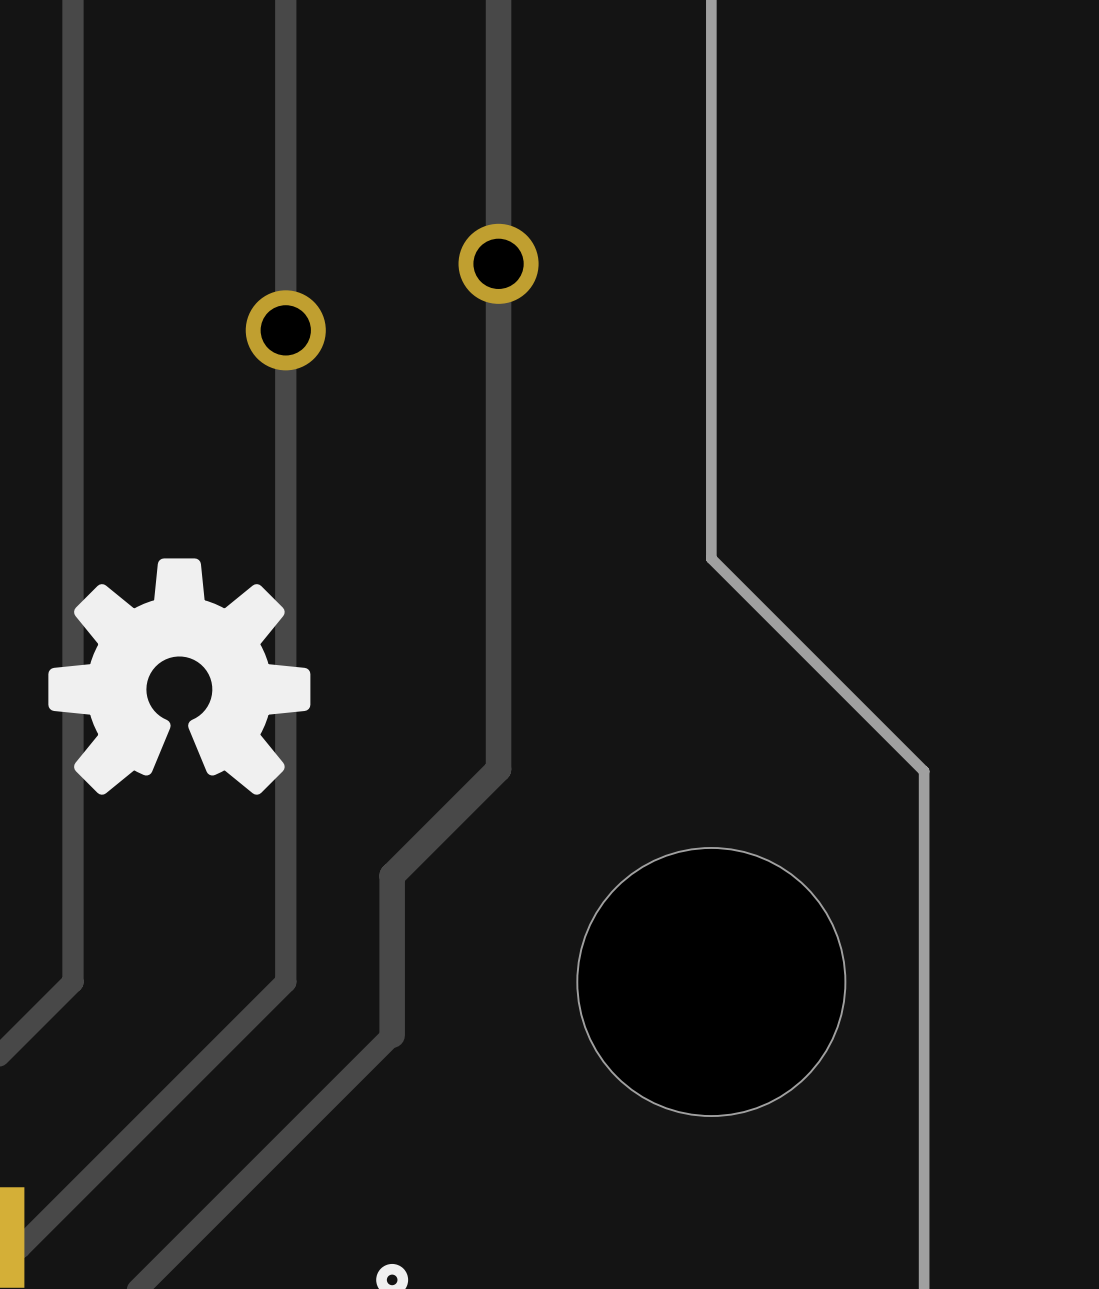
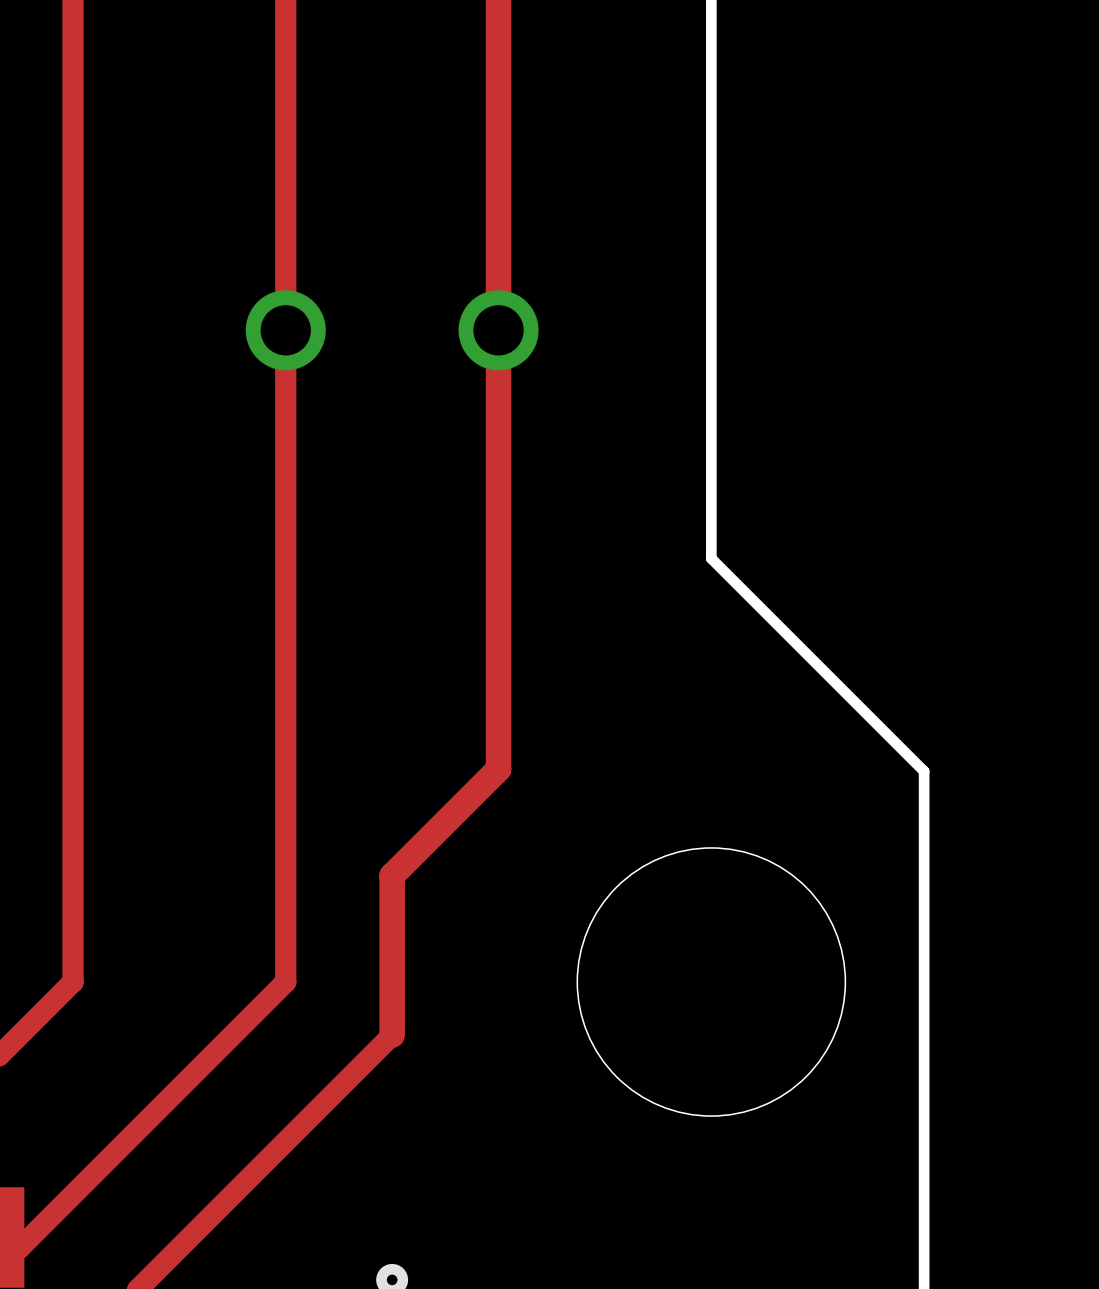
via position: (498, 263) -> (498, 330)
drawing: [48, 558, 311, 795] -> none

